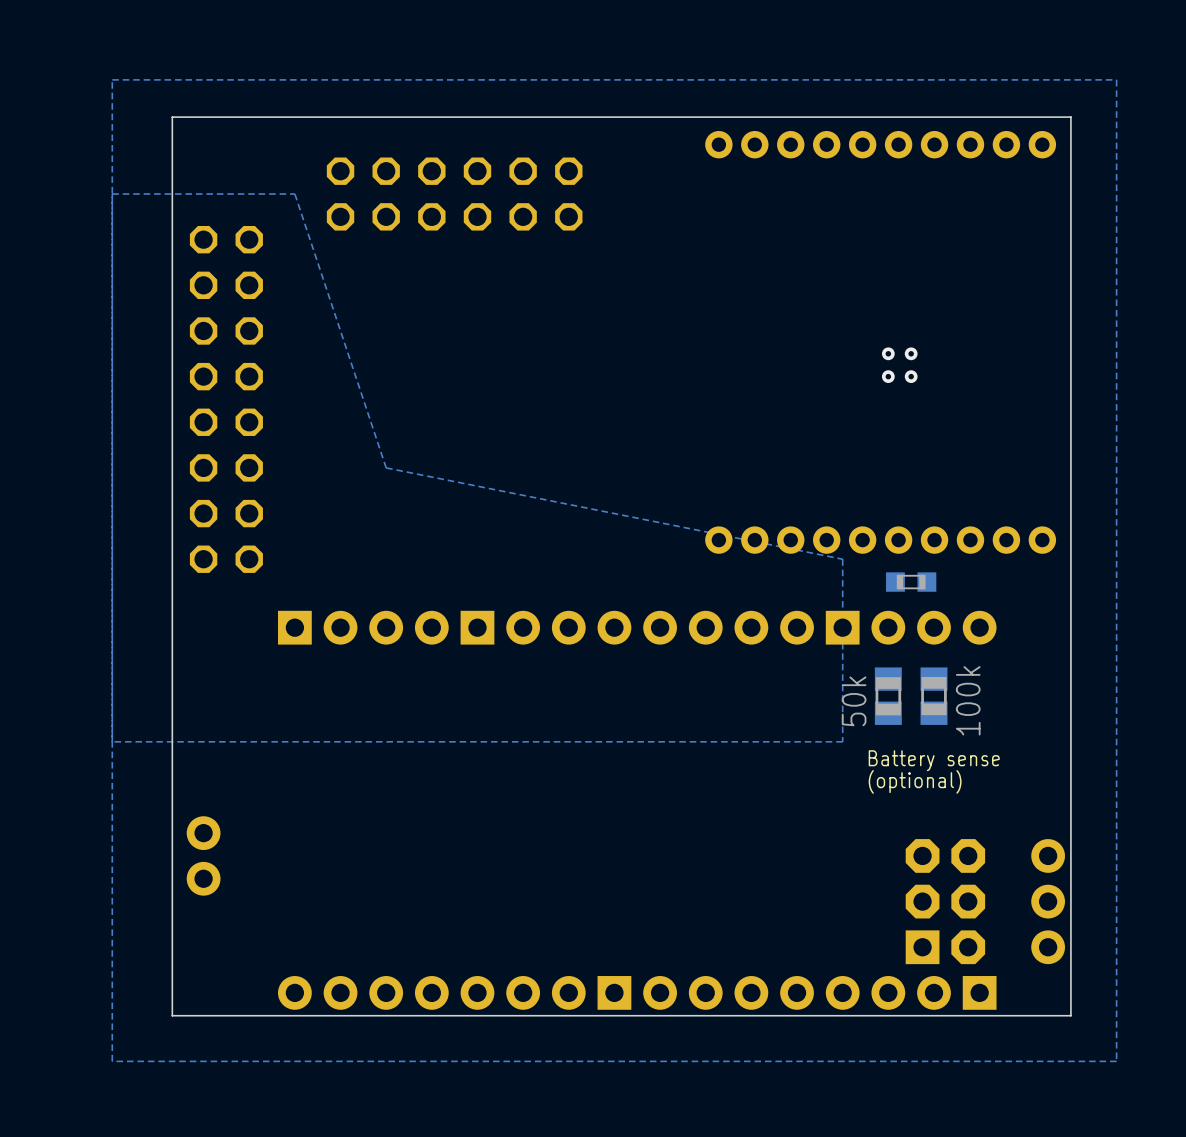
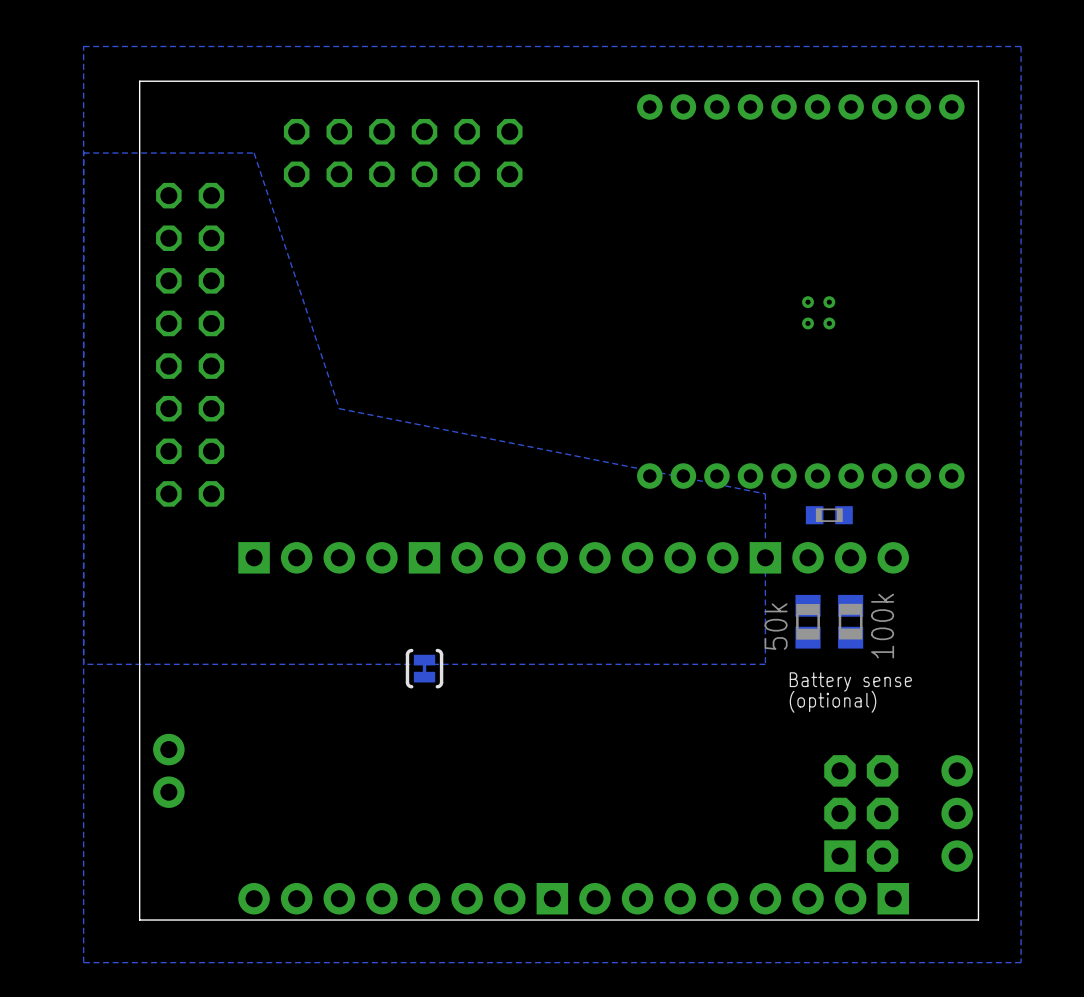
part: none -> (424, 668)

